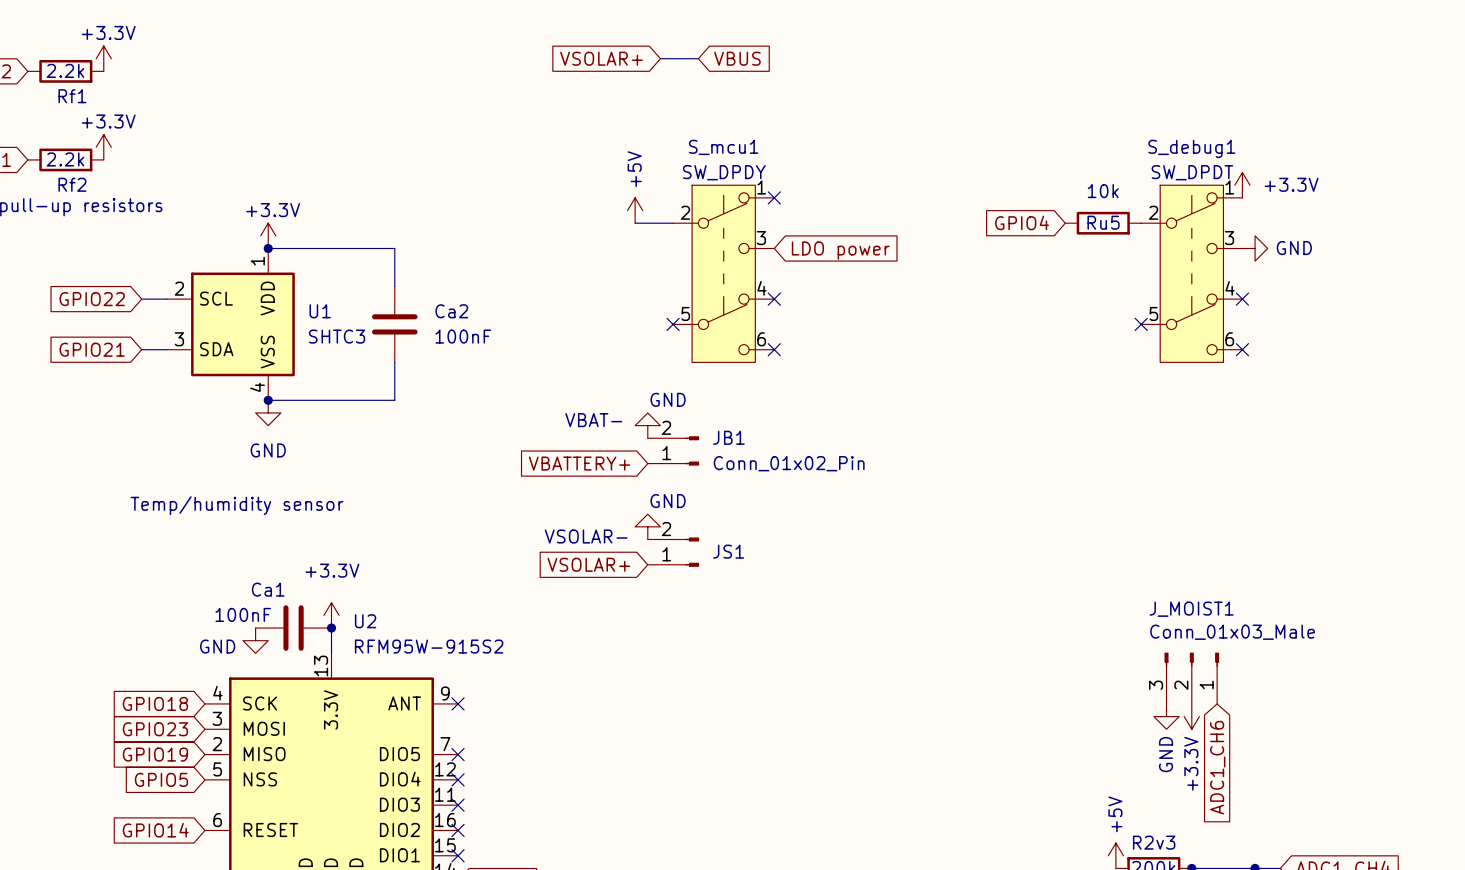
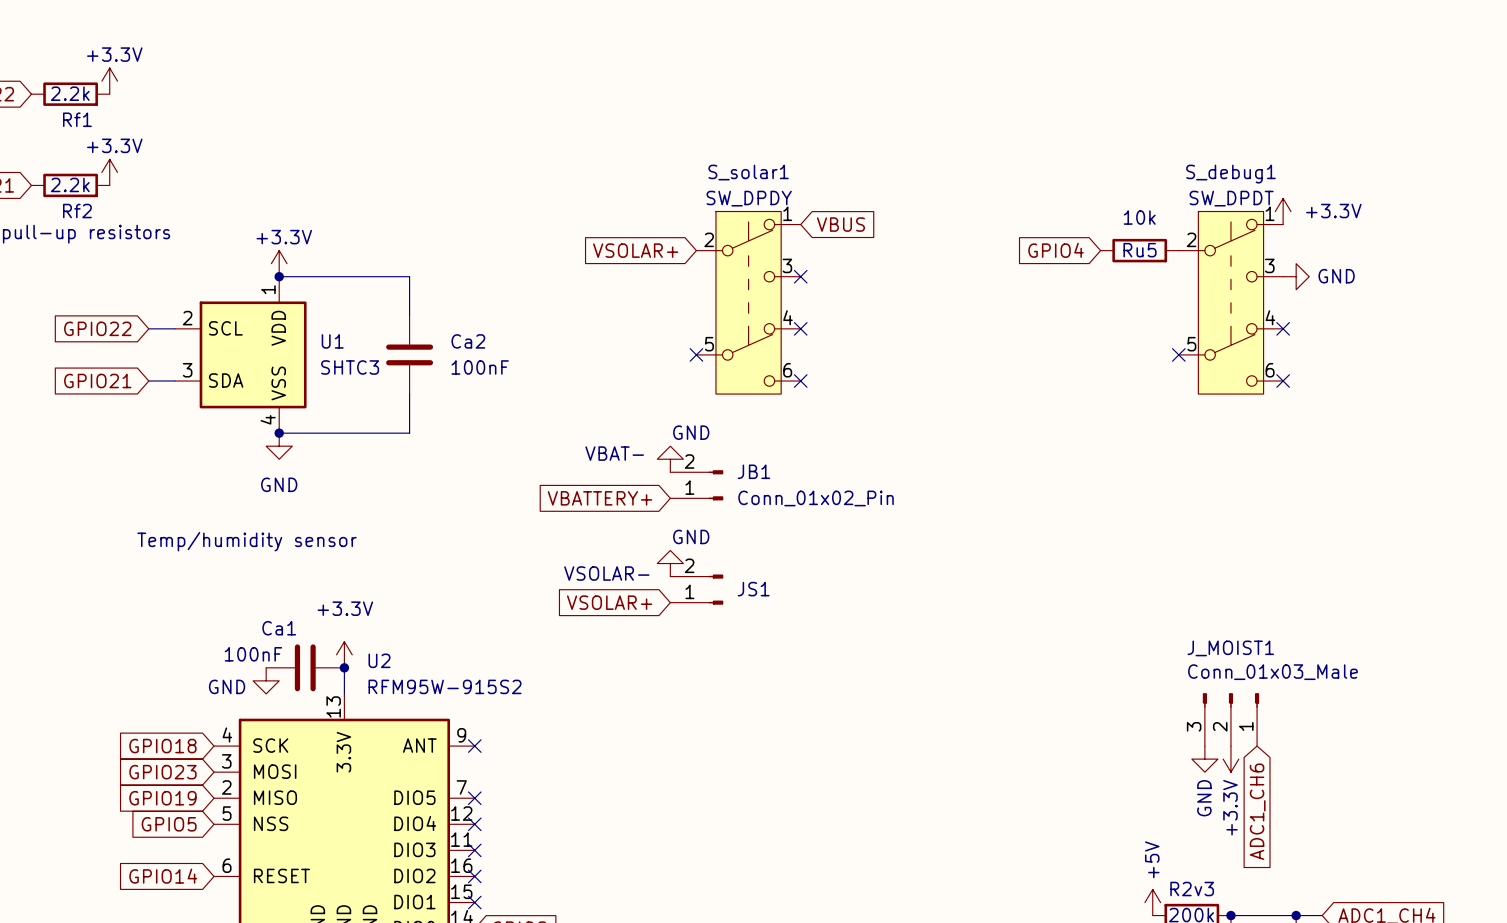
global label position: VSOLAR+ (601, 58) -> VSOLAR+ (635, 250)
wire: (660, 58) (698, 58) -> none
global label position: VBUS (737, 58) -> VBUS (840, 224)
S_mcu1 name: S_mcu1 (723, 147) -> S_solar1 (748, 172)
no-connect mark position: (774, 197) -> (800, 276)
power symbol: +5V (635, 210) -> none
wire: (635, 223) (673, 223) -> none
global label: LDO power (840, 250) -> none

